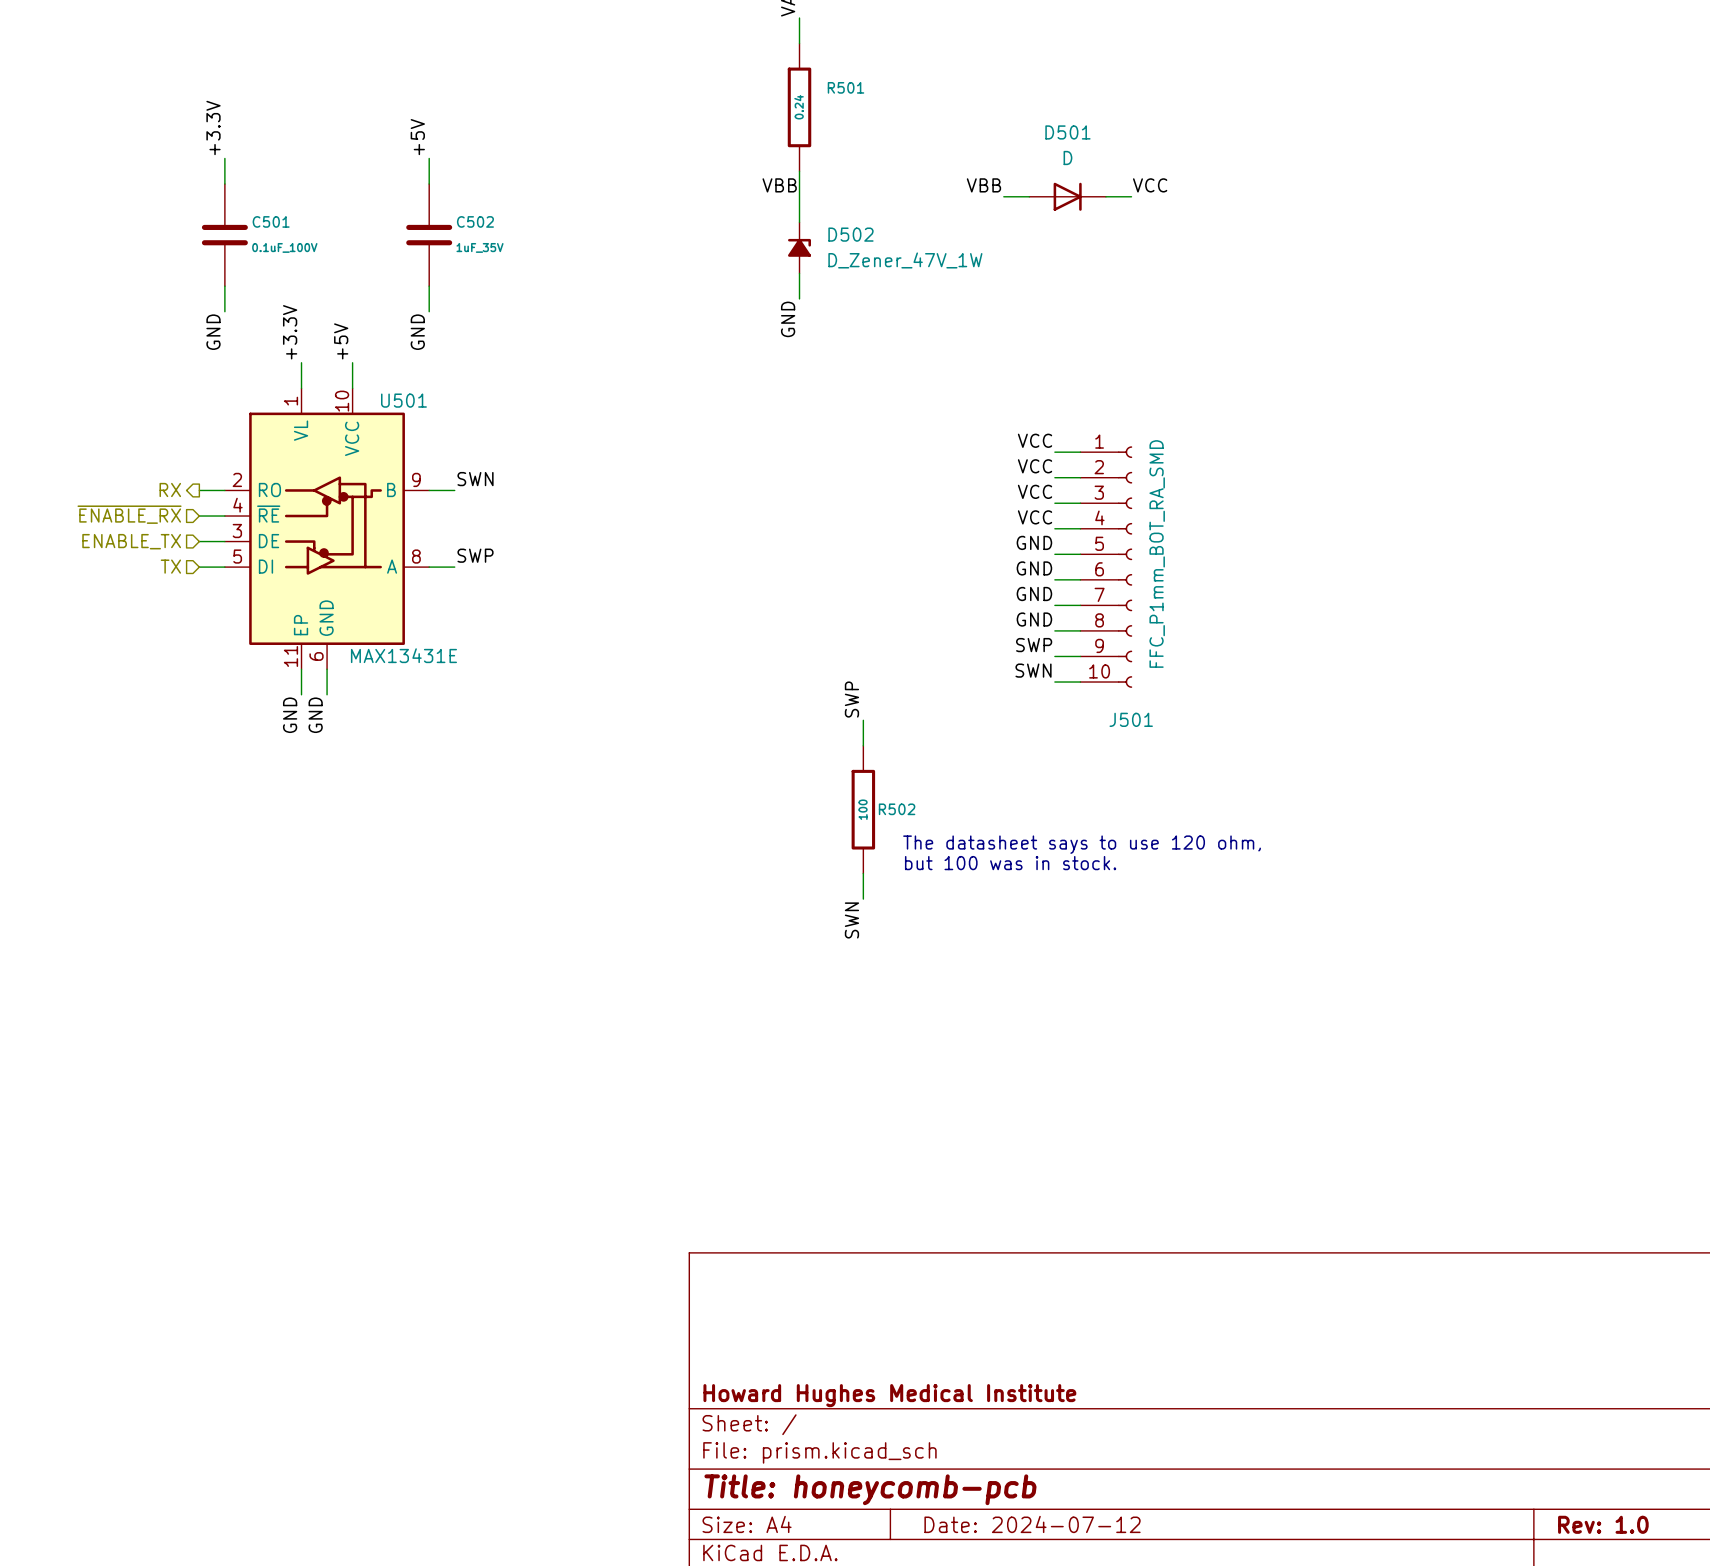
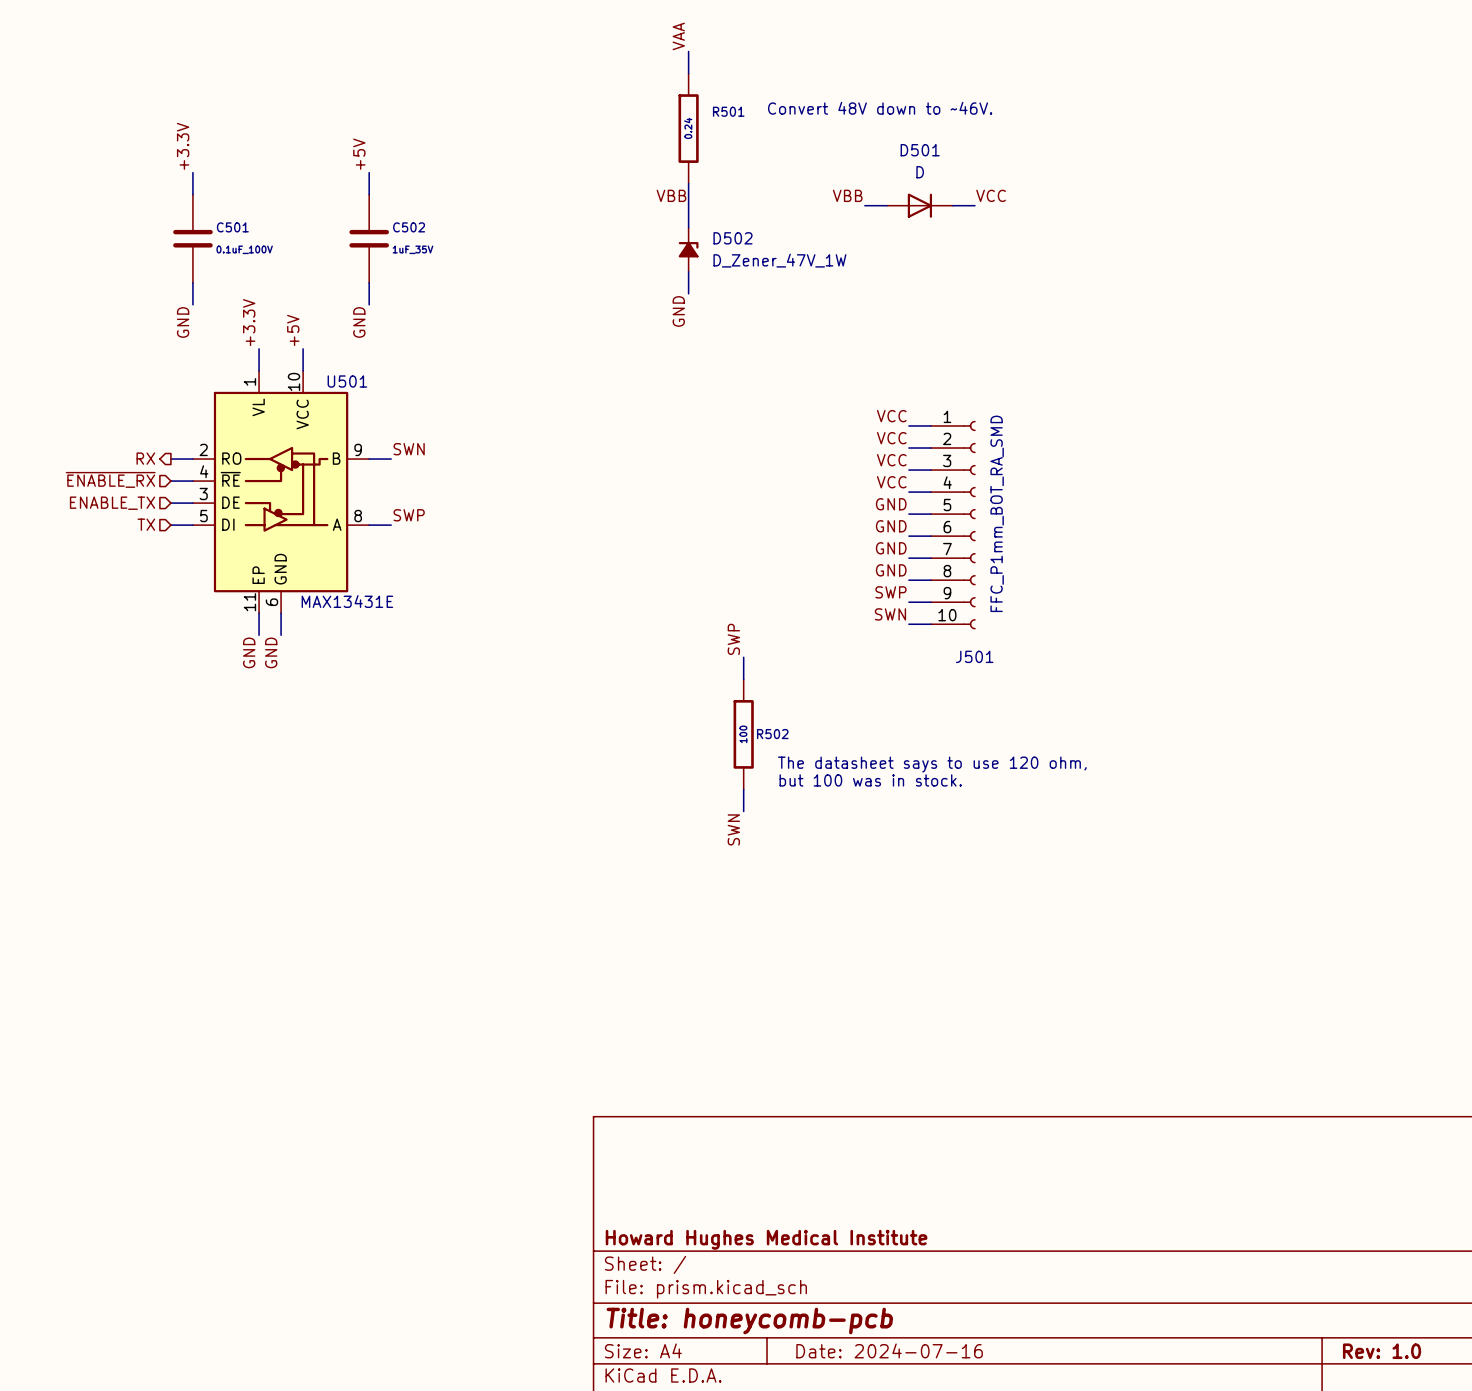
text: none -> Convert 48V down to ~46V. (880, 108)
title block: Date: 2024-07-12 (1032, 1524) -> Date: 2024-07-16 (889, 1350)

